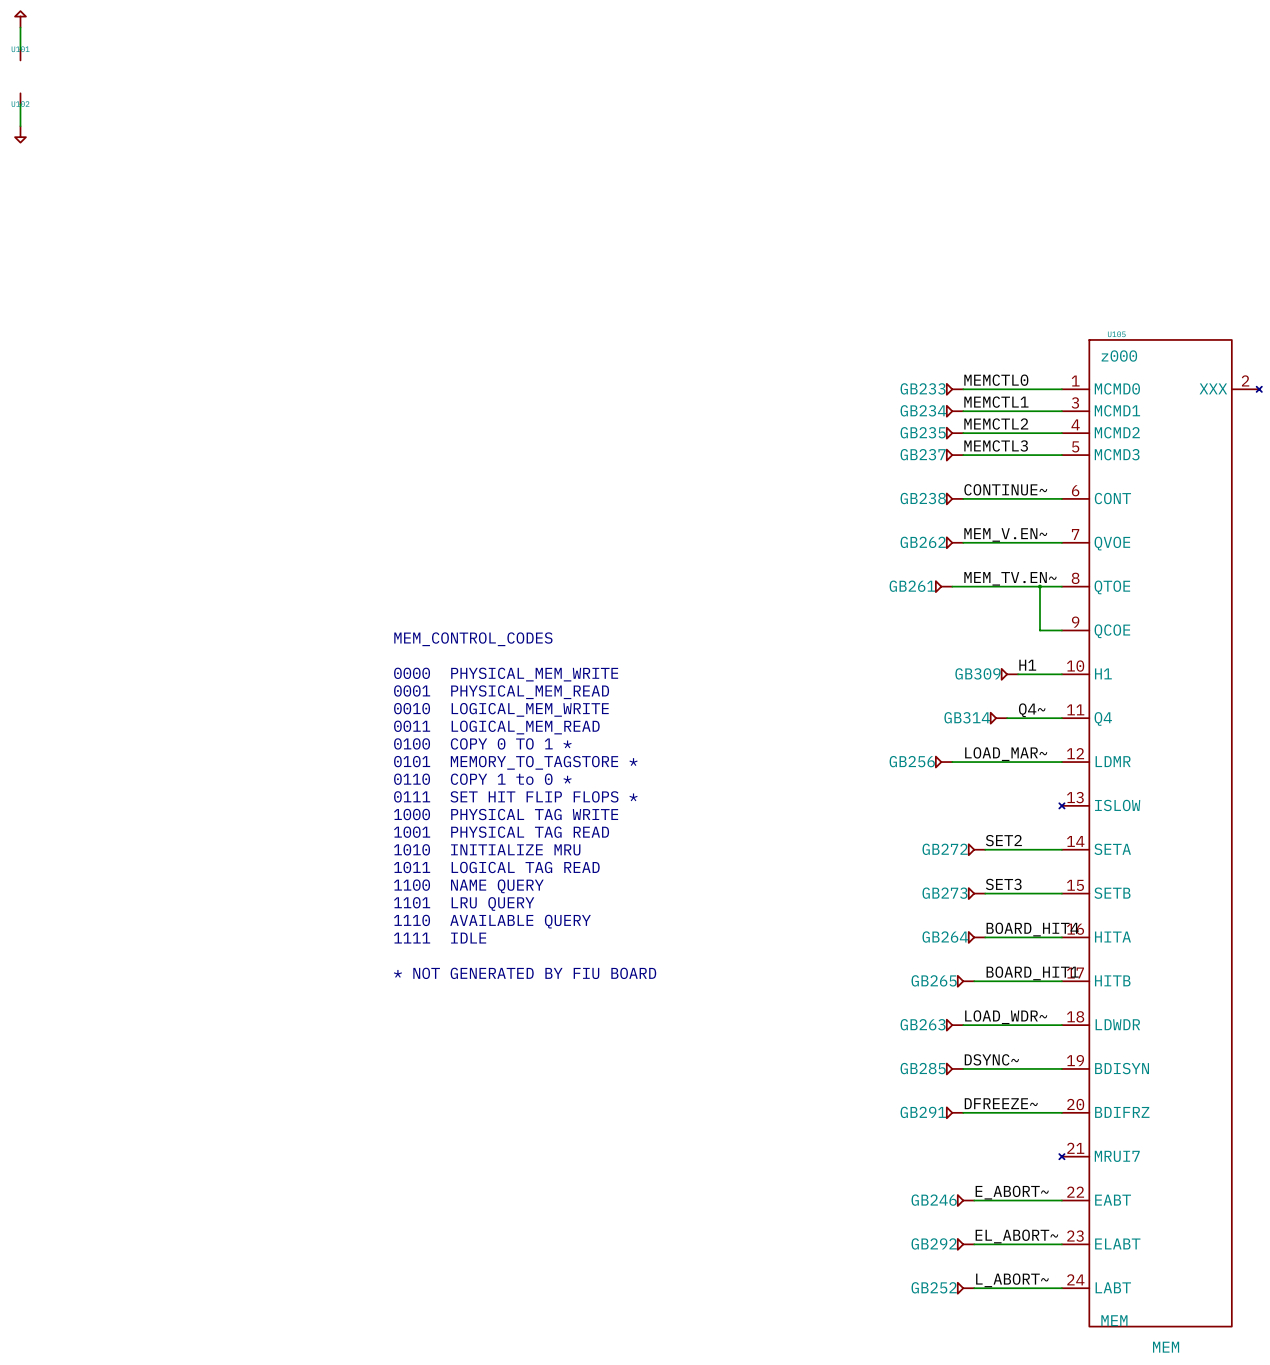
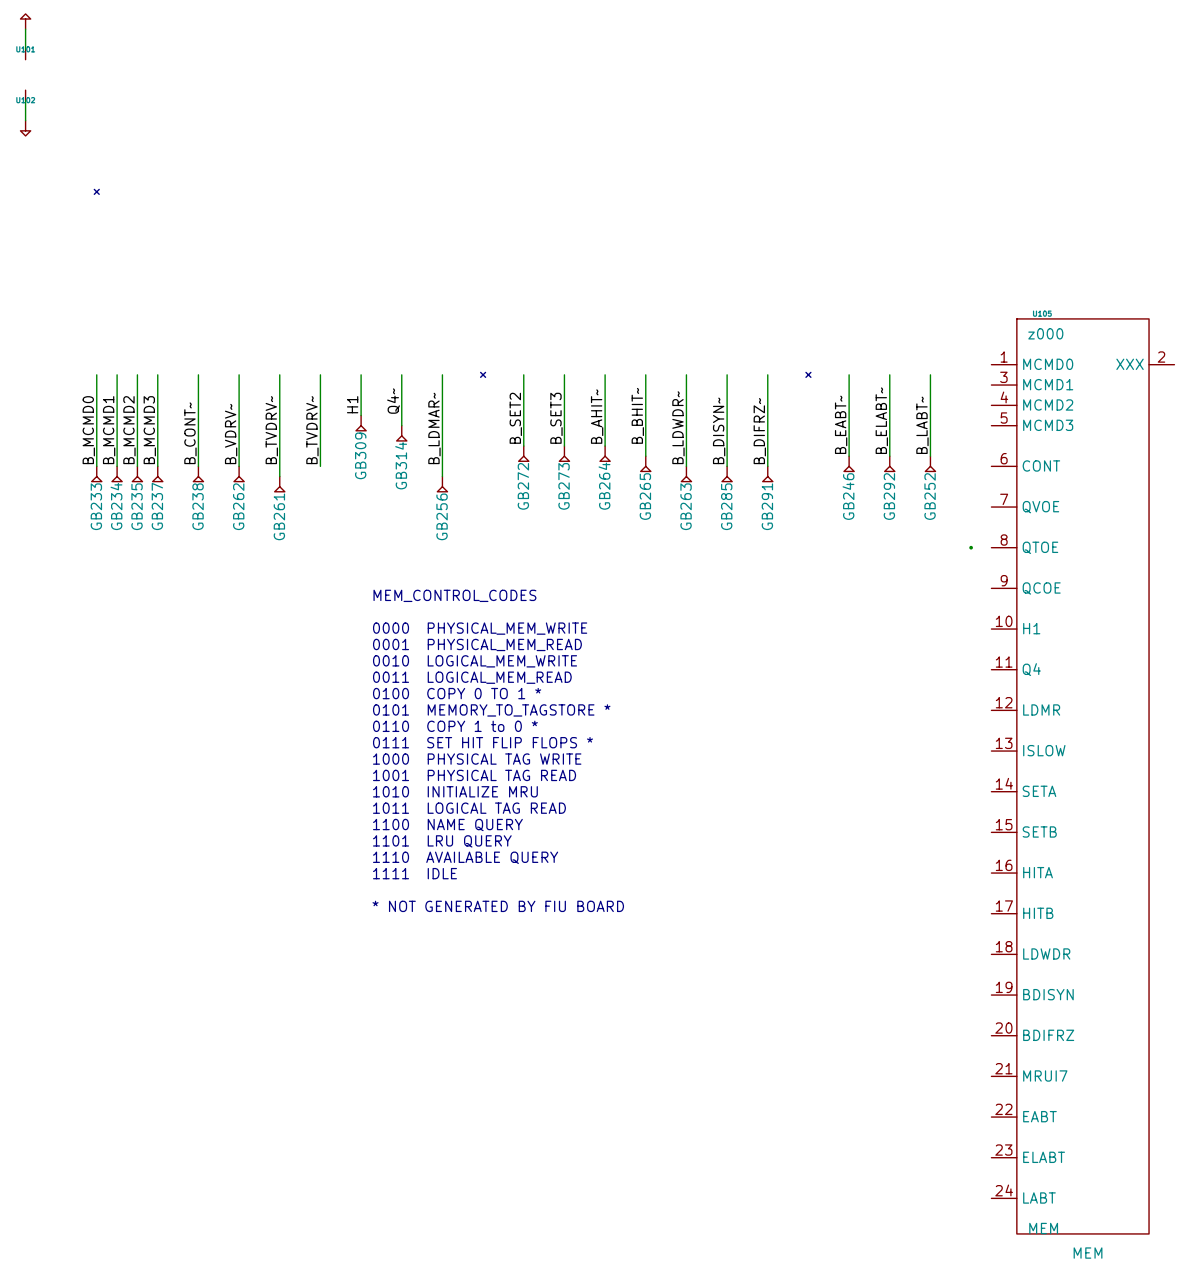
no-connect mark: none -> (96, 191)
label: MEMCTL0 (996, 380) -> none
GB233 rotation: 0° (949, 389) -> 90° counterclockwise (96, 479)
GB233 position: (954, 389) -> (96, 474)
wire: (963, 389) (1061, 389) -> none
no-connect mark: (1259, 389) -> none
wire: none -> (96, 374) (96, 466)
wire: none -> (117, 374) (117, 466)
wire: none -> (137, 374) (137, 466)
wire: none -> (157, 374) (157, 466)
wire: none -> (198, 374) (198, 466)
wire: none -> (239, 374) (239, 466)
wire: none -> (279, 374) (279, 476)
wire: none -> (320, 374) (320, 466)
wire: none -> (361, 374) (361, 415)
wire: none -> (401, 374) (401, 425)
wire: none -> (442, 374) (442, 476)
no-connect mark: none -> (483, 374)
wire: none -> (523, 374) (523, 446)
wire: none -> (564, 374) (564, 446)
wire: none -> (605, 374) (605, 446)
wire: none -> (645, 374) (645, 456)
wire: none -> (686, 374) (686, 466)
wire: none -> (727, 374) (727, 466)
wire: none -> (767, 374) (767, 466)
no-connect mark: none -> (808, 374)
wire: none -> (849, 374) (849, 456)
wire: none -> (889, 374) (889, 456)
wire: none -> (930, 374) (930, 456)
label: MEMCTL1 (996, 402) -> none
GB234 rotation: 0° (949, 411) -> 90° counterclockwise (117, 479)
GB234 position: (954, 411) -> (117, 474)
wire: (963, 411) (1061, 411) -> none
label: MEMCTL2 (996, 424) -> none
label: none -> Q4~ (393, 401)
GB235 rotation: 0° (949, 433) -> 90° counterclockwise (137, 479)
GB235 position: (954, 433) -> (137, 474)
wire: (963, 433) (1061, 433) -> none
label: none -> H1 (352, 404)
label: none -> B_AHIT~ (597, 416)
label: none -> B_BHIT~ (637, 415)
label: MEMCTL3 (996, 445) -> none
label: none -> B_SET2 (515, 418)
label: none -> B_SET3 (556, 418)
label: none -> B_ELABT~ (881, 420)
label: none -> B_EABT~ (841, 424)
label: none -> B_LABT~ (922, 425)
GB237 rotation: 0° (949, 455) -> 90° counterclockwise (157, 479)
GB237 position: (954, 455) -> (157, 474)
wire: (963, 455) (1061, 455) -> none
label: none -> B_TVDRV~ (271, 430)
label: none -> B_TVDRV~ (312, 430)
label: none -> B_LDMAR~ (434, 428)
label: none -> B_LDWDR~ (678, 427)
label: none -> B_DISYN~ (719, 430)
label: none -> B_DIFRZ~ (759, 431)
label: none -> B_MCMD0 (88, 430)
label: none -> B_MCMD1 (109, 430)
label: none -> B_MCMD2 (129, 430)
label: none -> B_MCMD3 (149, 430)
label: none -> B_CONT~ (190, 433)
label: none -> B_VDRV~ (231, 434)
label: CONTINUE~ (1005, 489) -> none
GB238 rotation: 0° (949, 498) -> 90° counterclockwise (198, 479)
GB238 position: (954, 498) -> (198, 474)
wire: (963, 498) (1061, 498) -> none
label: MEM_V.EN~ (1005, 534) -> none
GB262 rotation: 0° (949, 542) -> 90° counterclockwise (239, 479)
GB262 position: (954, 542) -> (239, 474)
wire: (963, 542) (1061, 542) -> none
label: MEM_TV.EN~ (1010, 578) -> none
GB261 rotation: 0° (938, 586) -> 90° counterclockwise (279, 489)
GB261 position: (943, 586) -> (279, 484)
wire: (952, 586) (1061, 586) -> none
wire: (1039, 586) (1039, 630) (1061, 630) -> none
label: H1 (1027, 665) -> none
GB309 rotation: 0° (1004, 674) -> 90° counterclockwise (361, 428)
GB309 position: (1009, 674) -> (361, 423)
wire: (1018, 674) (1061, 674) -> none
label: Q4~ (1032, 710) -> none
GB314 rotation: 0° (993, 718) -> 90° counterclockwise (401, 438)
GB314 position: (998, 718) -> (401, 433)
wire: (1007, 718) (1061, 718) -> none
label: LOAD_MAR~ (1006, 754) -> none
GB256 rotation: 0° (938, 762) -> 90° counterclockwise (442, 489)
GB256 position: (943, 762) -> (442, 484)
wire: (952, 762) (1061, 762) -> none
no-connect mark: (1061, 805) -> none
label: SET2 (1003, 840) -> none
GB272 rotation: 0° (971, 849) -> 90° counterclockwise (523, 458)
GB272 position: (976, 849) -> (523, 453)
wire: (985, 849) (1061, 849) -> none
label: SET3 (1003, 884) -> none
GB273 rotation: 0° (971, 893) -> 90° counterclockwise (564, 458)
GB273 position: (976, 893) -> (564, 453)
wire: (985, 893) (1061, 893) -> none
label: BOARD_HIT4 (1032, 929) -> none
GB264 rotation: 0° (971, 937) -> 90° counterclockwise (605, 458)
GB264 position: (976, 937) -> (605, 453)
wire: (985, 937) (1061, 937) -> none
label: BOARD_HIT1 (1032, 973) -> none
GB265 rotation: 0° (960, 981) -> 90° counterclockwise (645, 468)
GB265 position: (965, 981) -> (645, 463)
wire: (974, 981) (1061, 981) -> none
label: LOAD_WDR~ (1006, 1017) -> none
GB263 rotation: 0° (949, 1025) -> 90° counterclockwise (686, 479)
GB263 position: (954, 1025) -> (686, 474)
wire: (963, 1025) (1061, 1025) -> none
label: DSYNC~ (991, 1059) -> none
GB285 rotation: 0° (949, 1068) -> 90° counterclockwise (727, 479)
GB285 position: (954, 1068) -> (727, 474)
wire: (963, 1068) (1061, 1068) -> none
label: DFREEZE~ (1001, 1103) -> none
GB291 rotation: 0° (949, 1112) -> 90° counterclockwise (767, 479)
GB291 position: (954, 1112) -> (767, 474)
wire: (963, 1112) (1061, 1112) -> none
no-connect mark: (1061, 1156) -> none
label: E_ABORT~ (1012, 1192) -> none
GB246 rotation: 0° (960, 1200) -> 90° counterclockwise (849, 468)
GB246 position: (965, 1200) -> (849, 463)
wire: (974, 1200) (1061, 1200) -> none
label: EL_ABORT~ (1016, 1236) -> none
GB292 rotation: 0° (960, 1244) -> 90° counterclockwise (889, 468)
GB292 position: (965, 1244) -> (889, 463)
wire: (974, 1244) (1061, 1244) -> none
label: L_ABORT~ (1012, 1280) -> none
GB252 rotation: 0° (960, 1288) -> 90° counterclockwise (930, 468)
GB252 position: (965, 1288) -> (930, 463)
wire: (974, 1288) (1061, 1288) -> none

